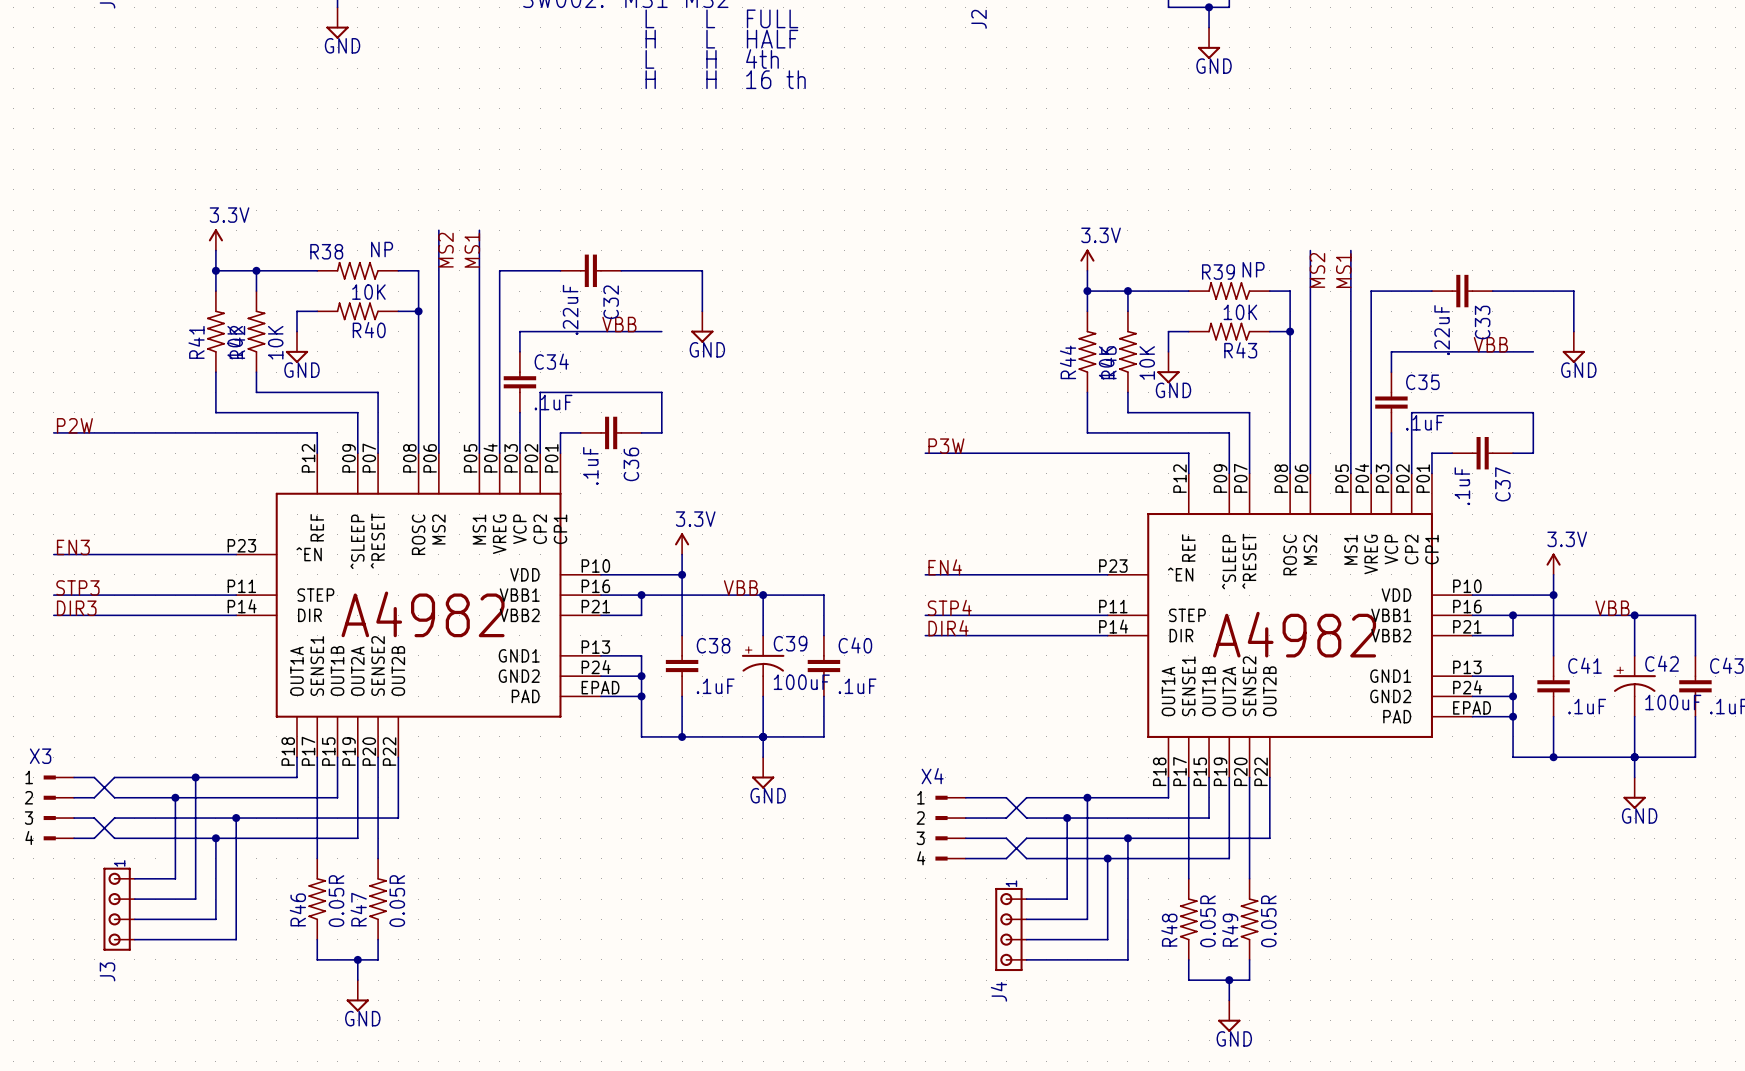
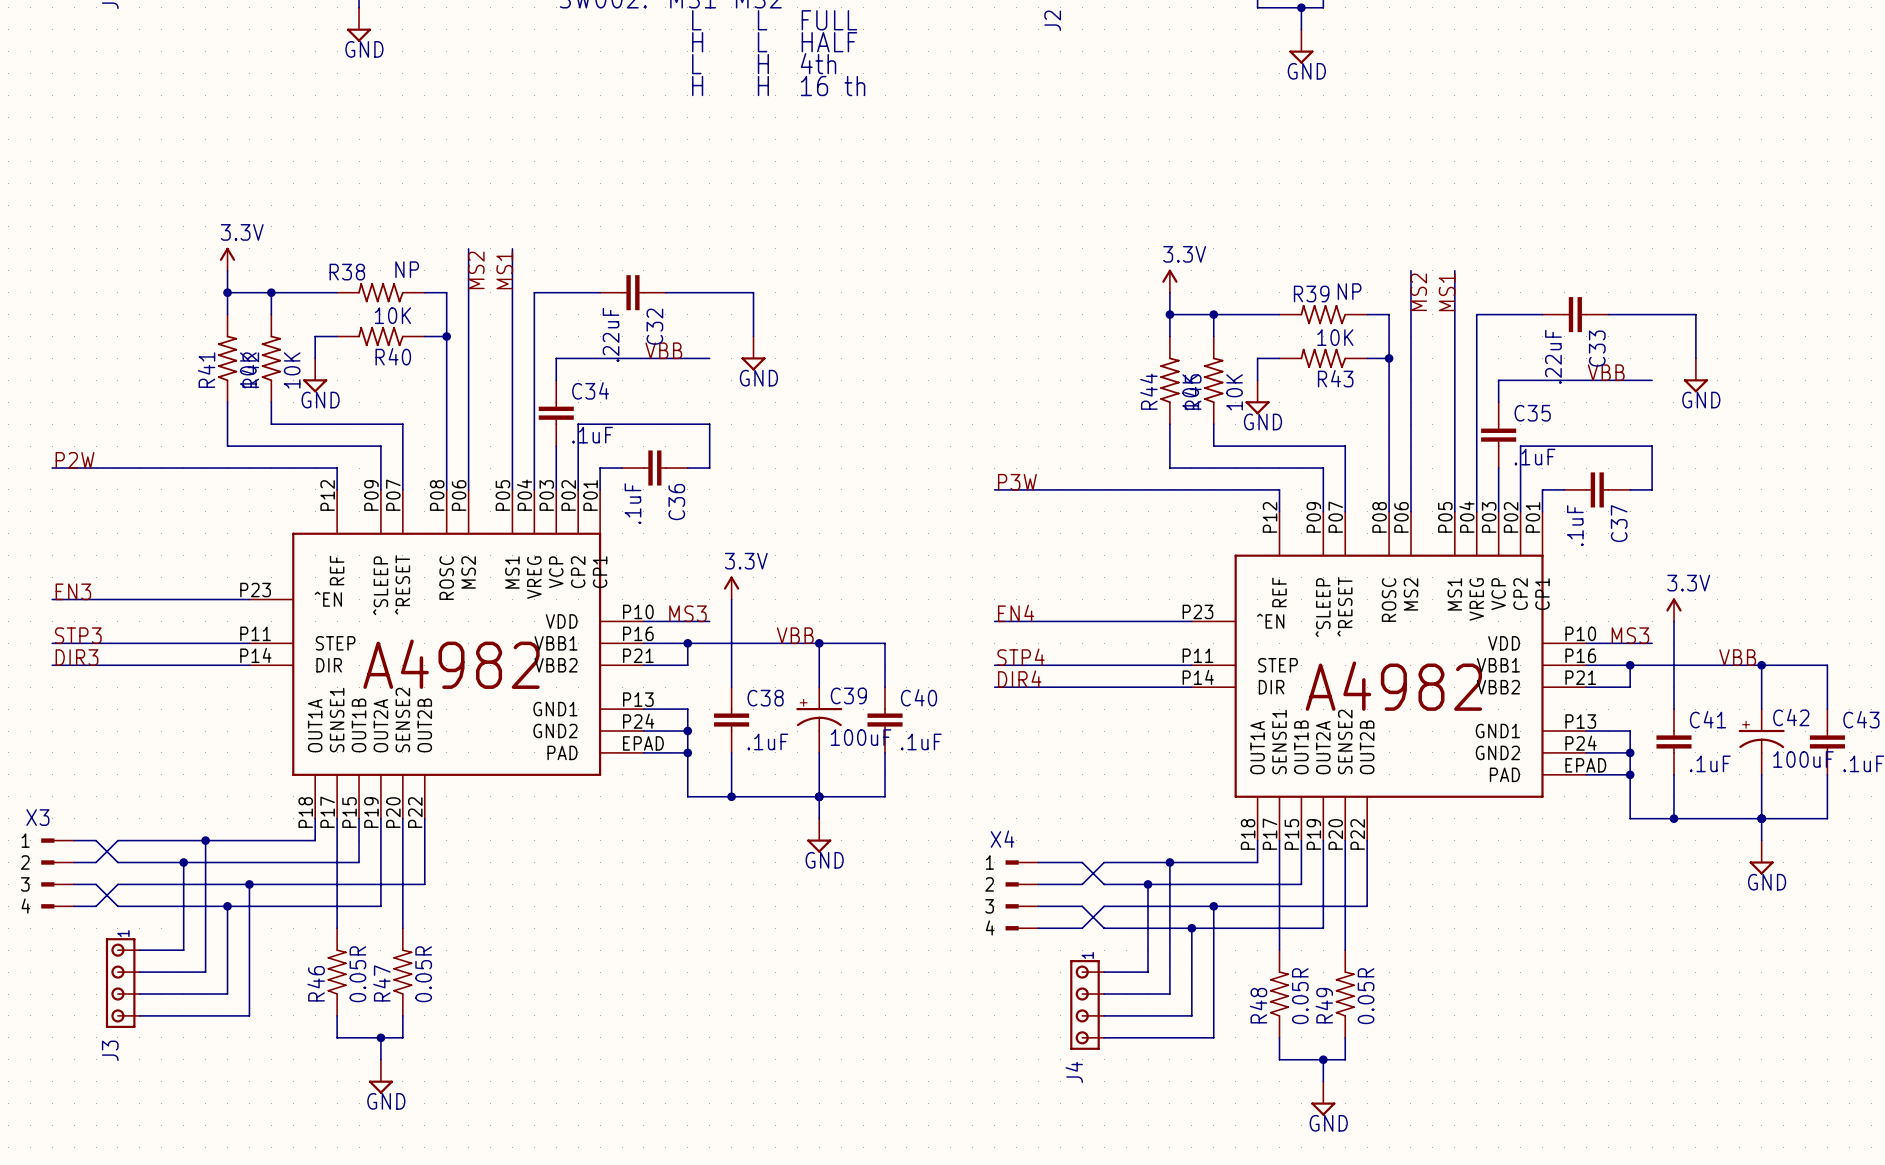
label: none -> MS3 (688, 613)
wire: (661, 574) (682, 574) -> none
junction: (682, 574) -> none
label: none -> MS3 (1630, 635)
wire: (1533, 595) (1553, 595) -> none
junction: (1553, 595) -> none

